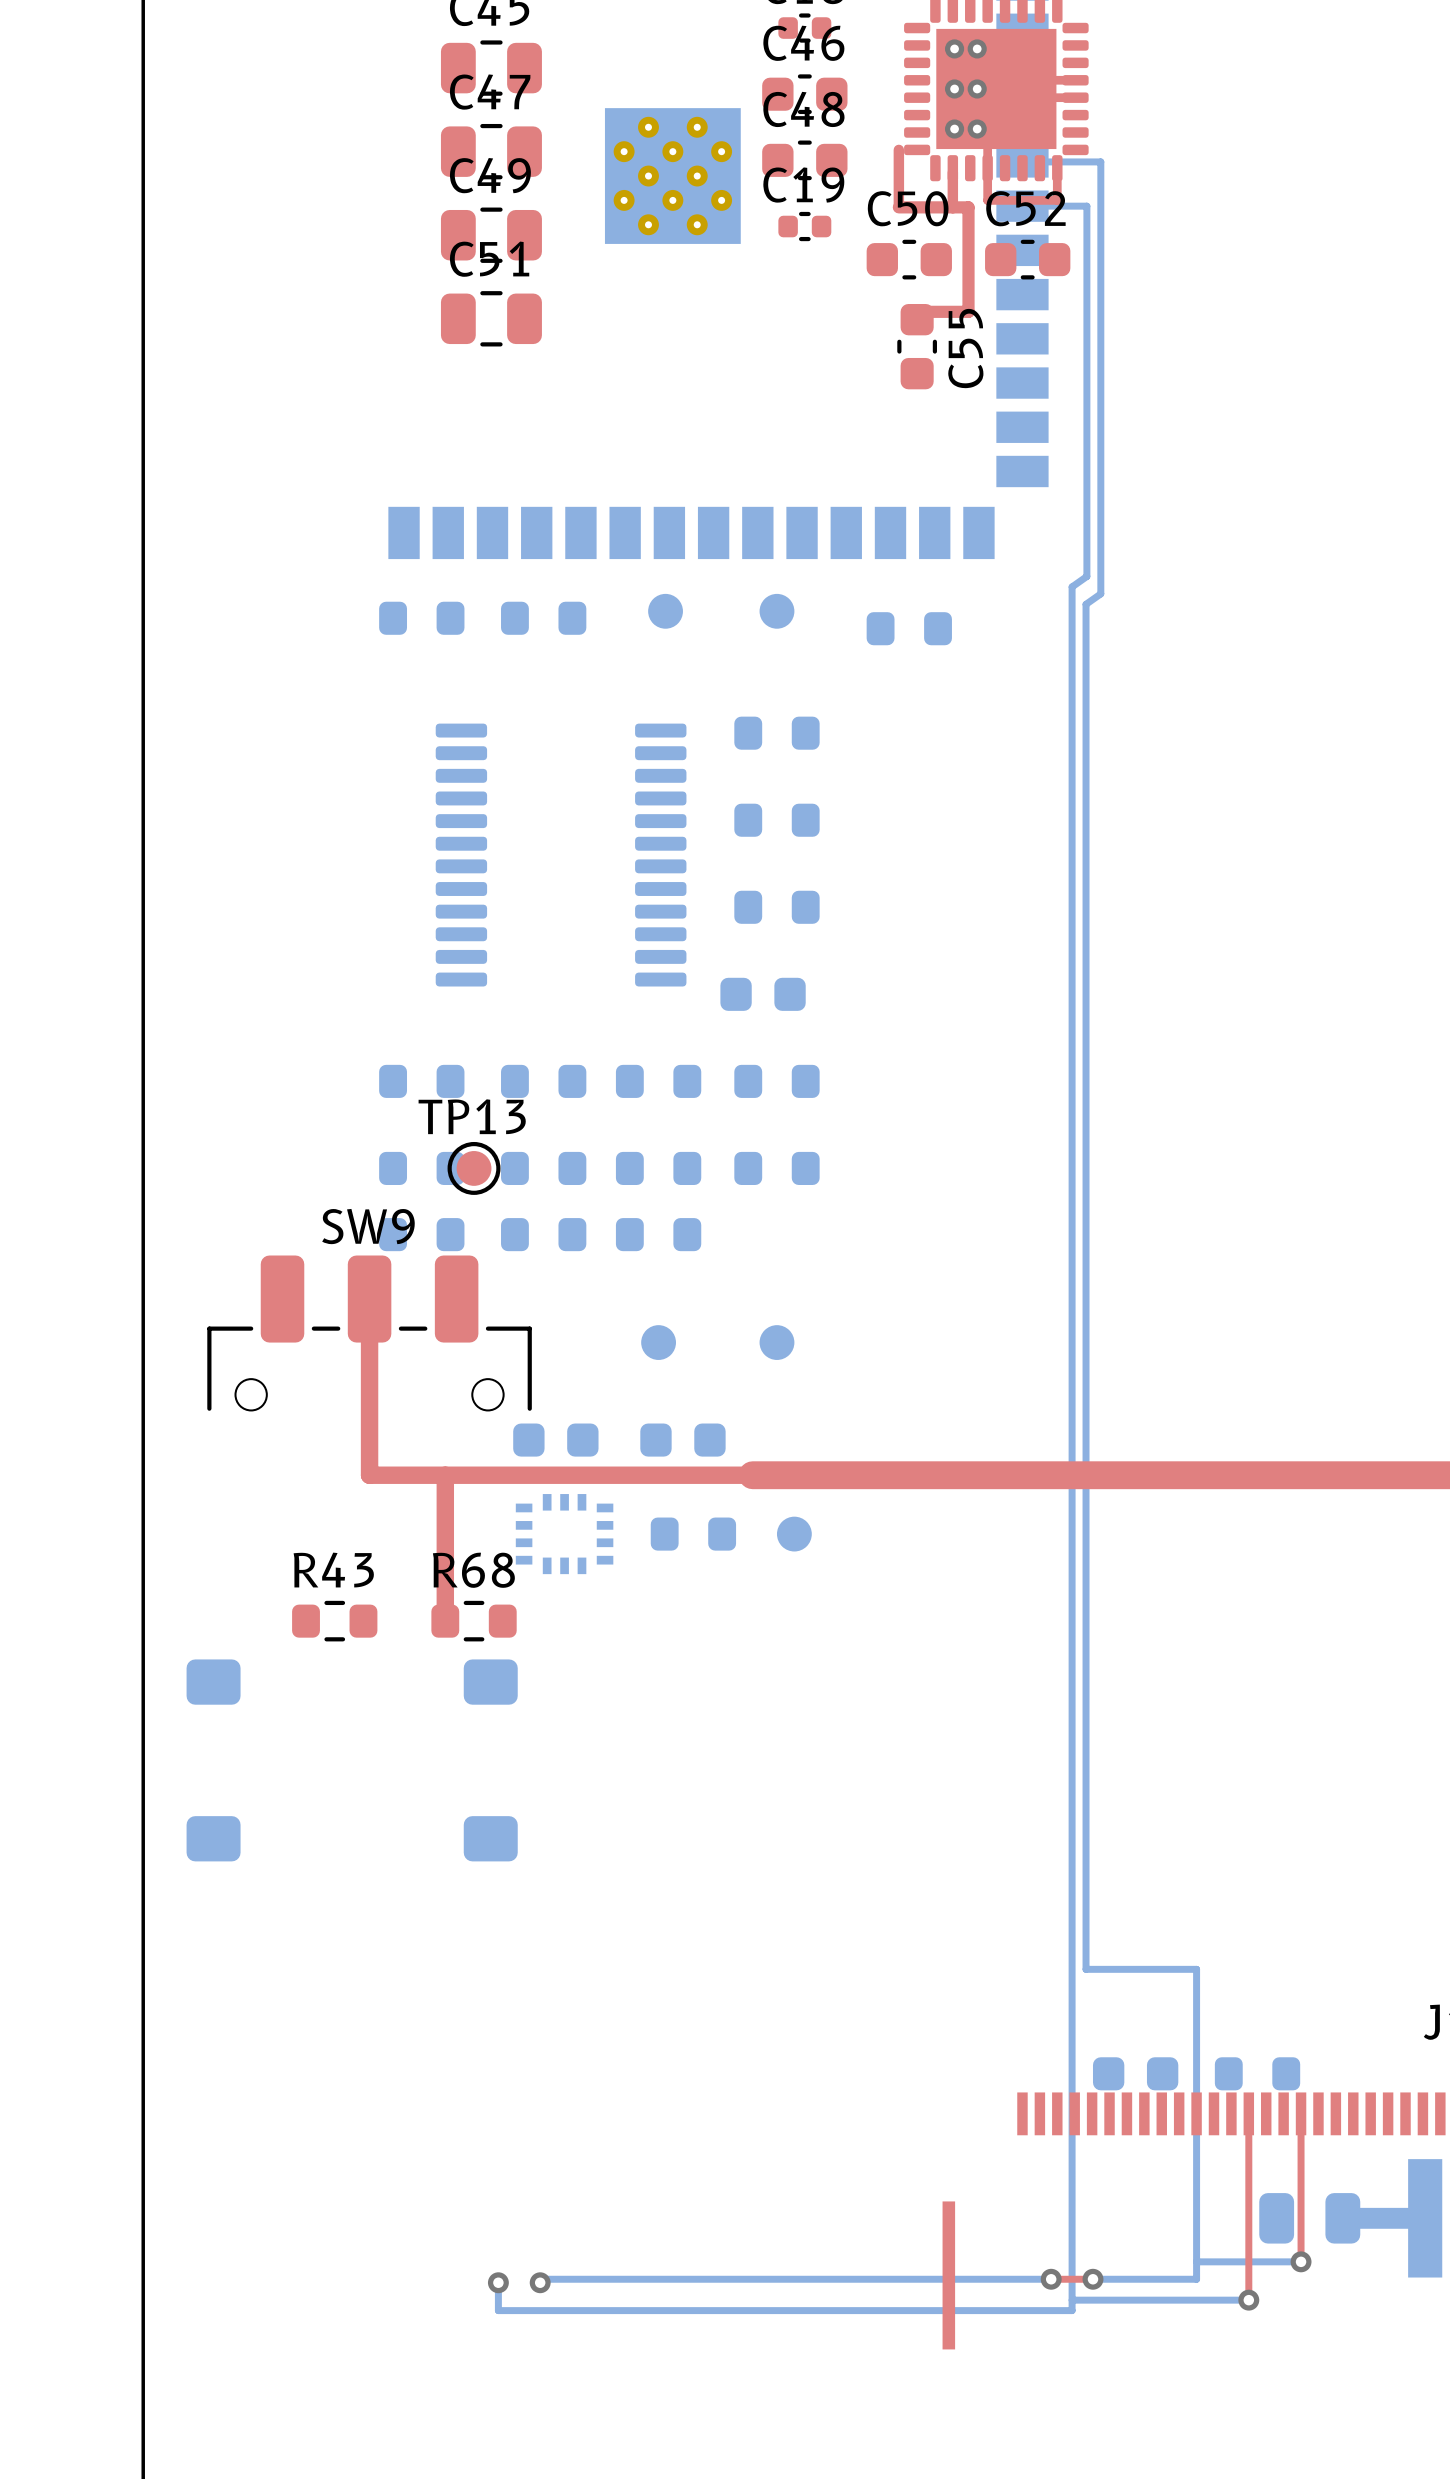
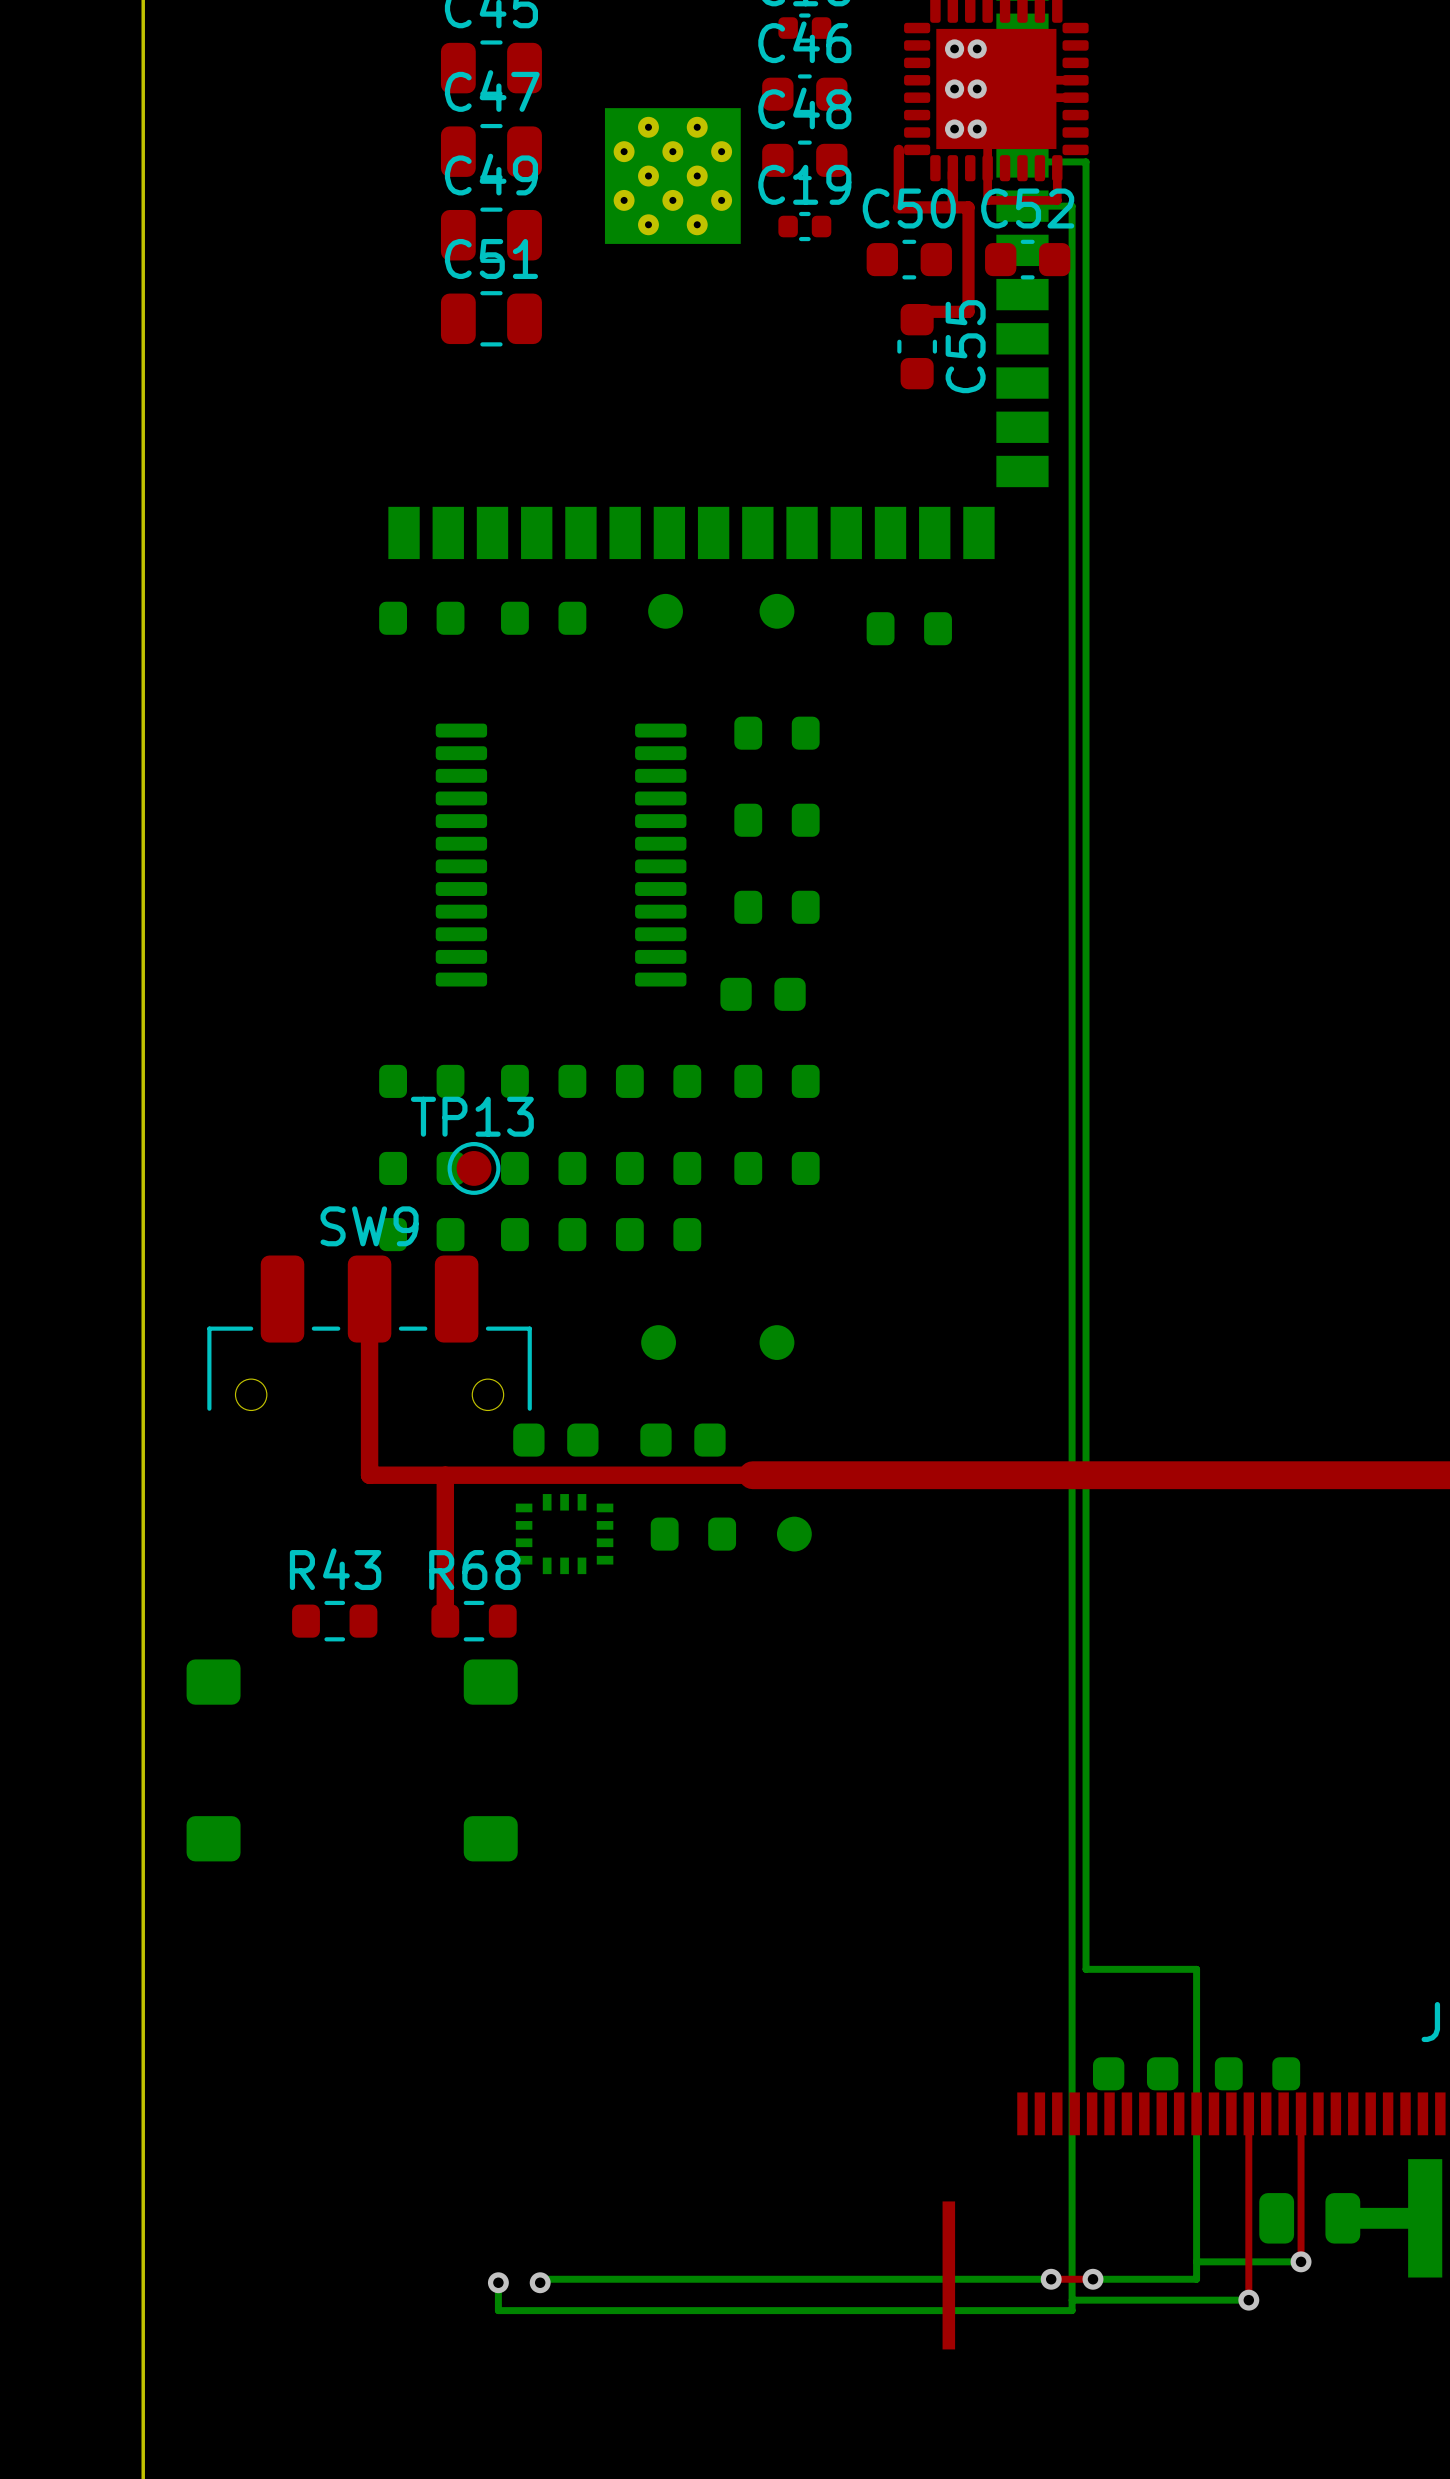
bottom track: (1086, 161) (1100, 161) (1100, 593) (1086, 604) -> (1086, 161) (1086, 604)
bottom track: (1072, 206) (1086, 206) (1086, 576) (1072, 586) (1072, 2310) -> (1072, 206) (1072, 2310)

